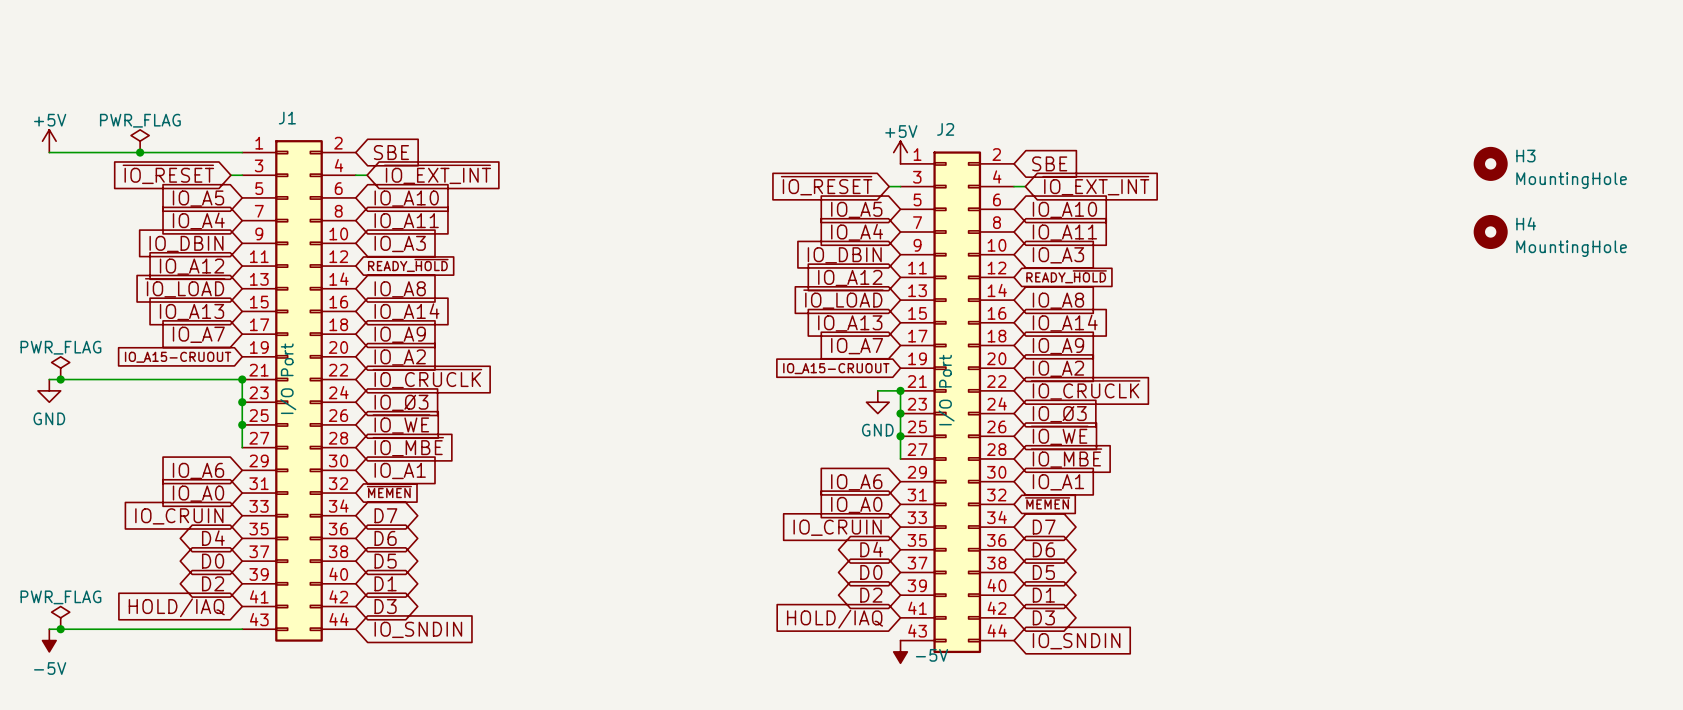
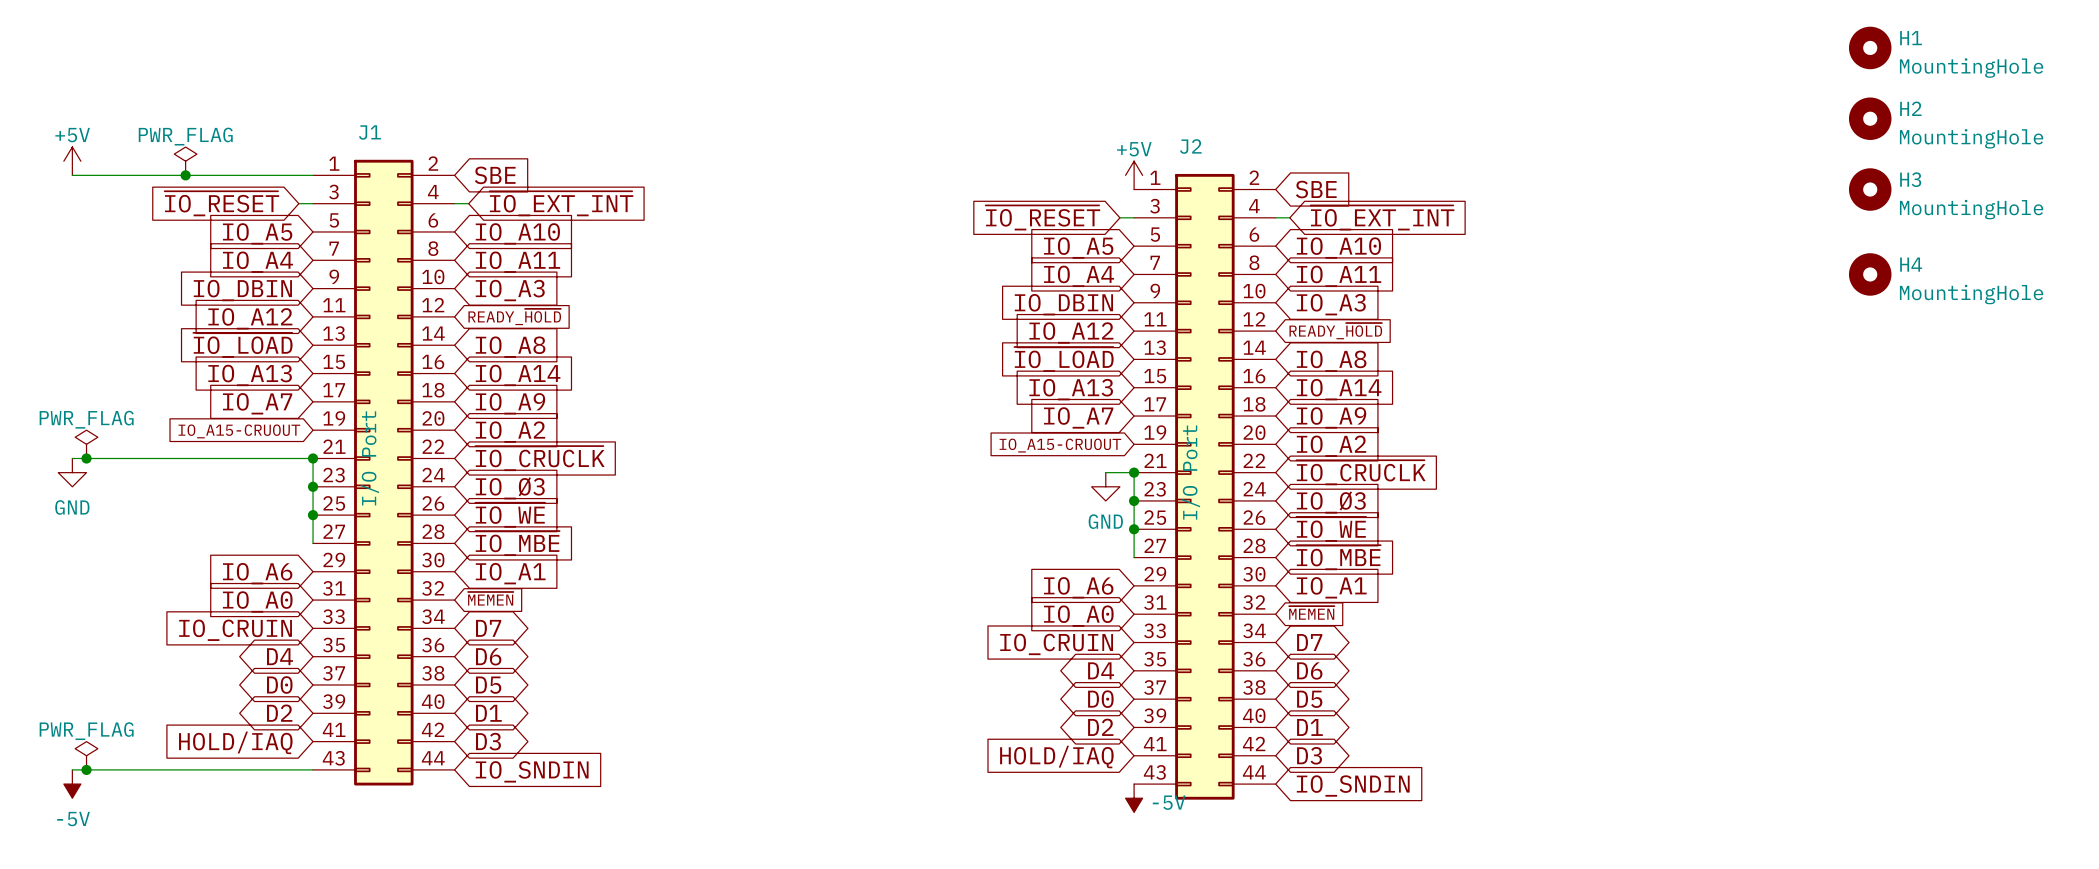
H1: none -> MountingHole (1870, 47)
H2: none -> MountingHole (1870, 118)

